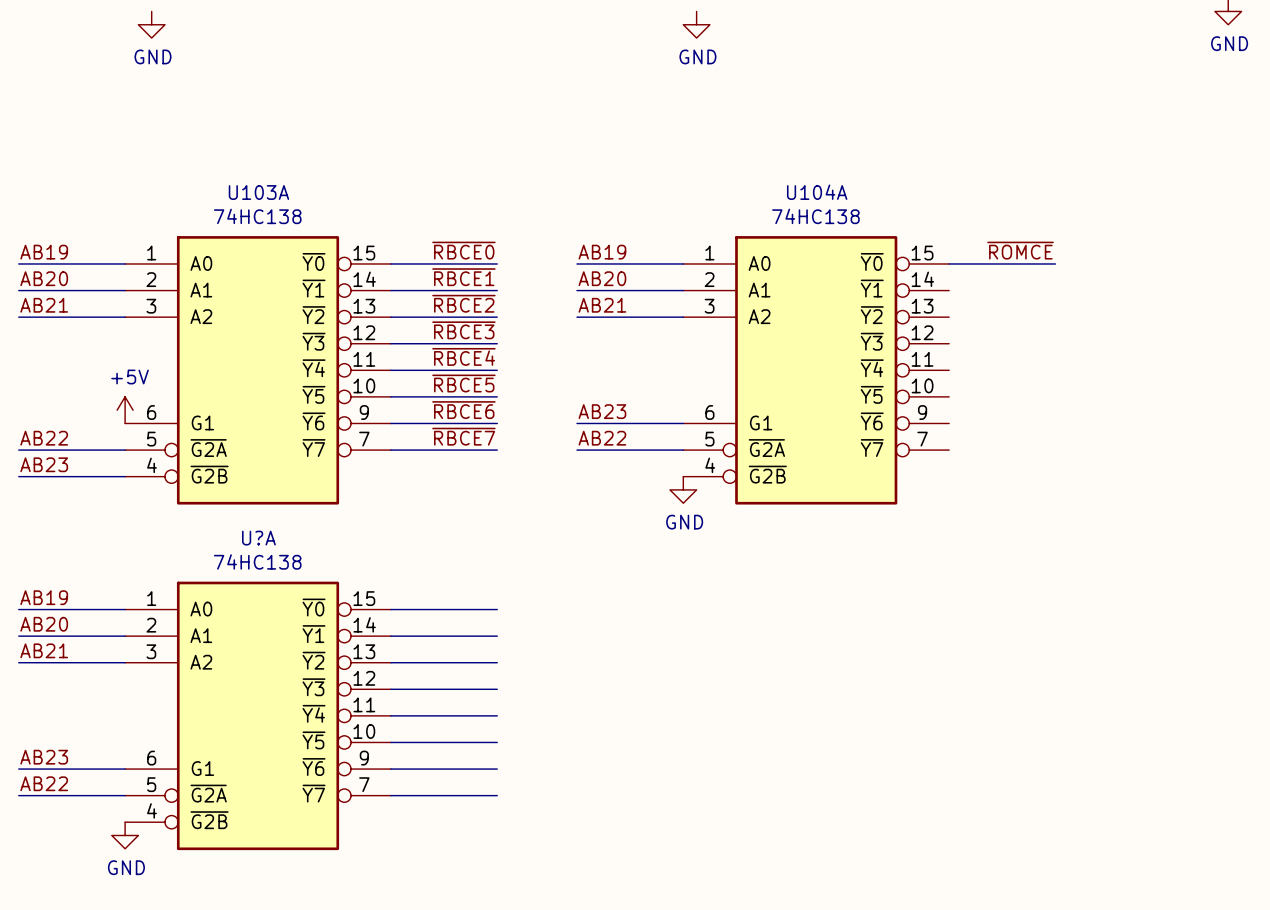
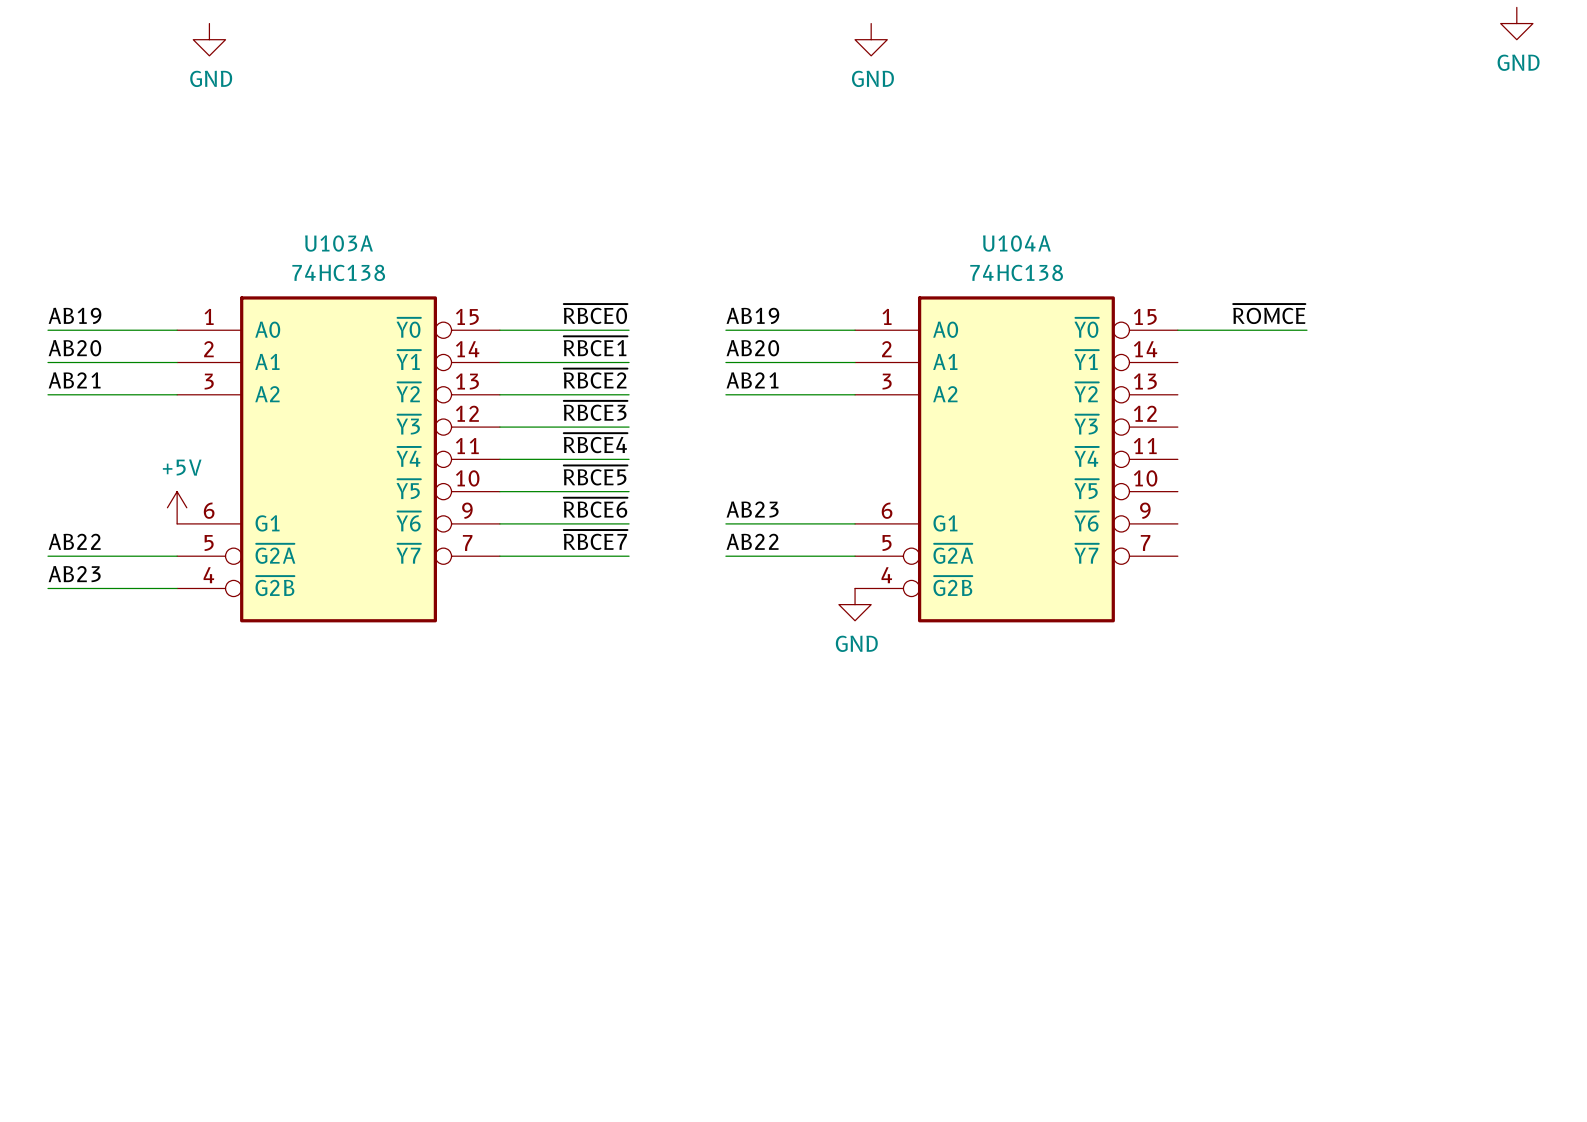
label: AB19 (44, 597) -> none
wire: (18, 609) (125, 609) -> none
wire: (390, 609) (497, 609) -> none
label: AB20 (44, 624) -> none
wire: (18, 636) (125, 636) -> none
wire: (390, 636) (497, 636) -> none
label: AB21 (44, 650) -> none
wire: (18, 662) (125, 662) -> none
wire: (390, 662) (497, 662) -> none
wire: (390, 689) (497, 689) -> none
U?A: 74HC138 (258, 715) -> none
wire: (390, 715) (497, 715) -> none
wire: (390, 742) (497, 742) -> none
label: AB23 (44, 757) -> none
wire: (18, 769) (125, 769) -> none
wire: (390, 769) (497, 769) -> none
label: AB22 (44, 783) -> none
wire: (18, 795) (125, 795) -> none
wire: (390, 795) (497, 795) -> none
power symbol: GND (125, 835) -> none

